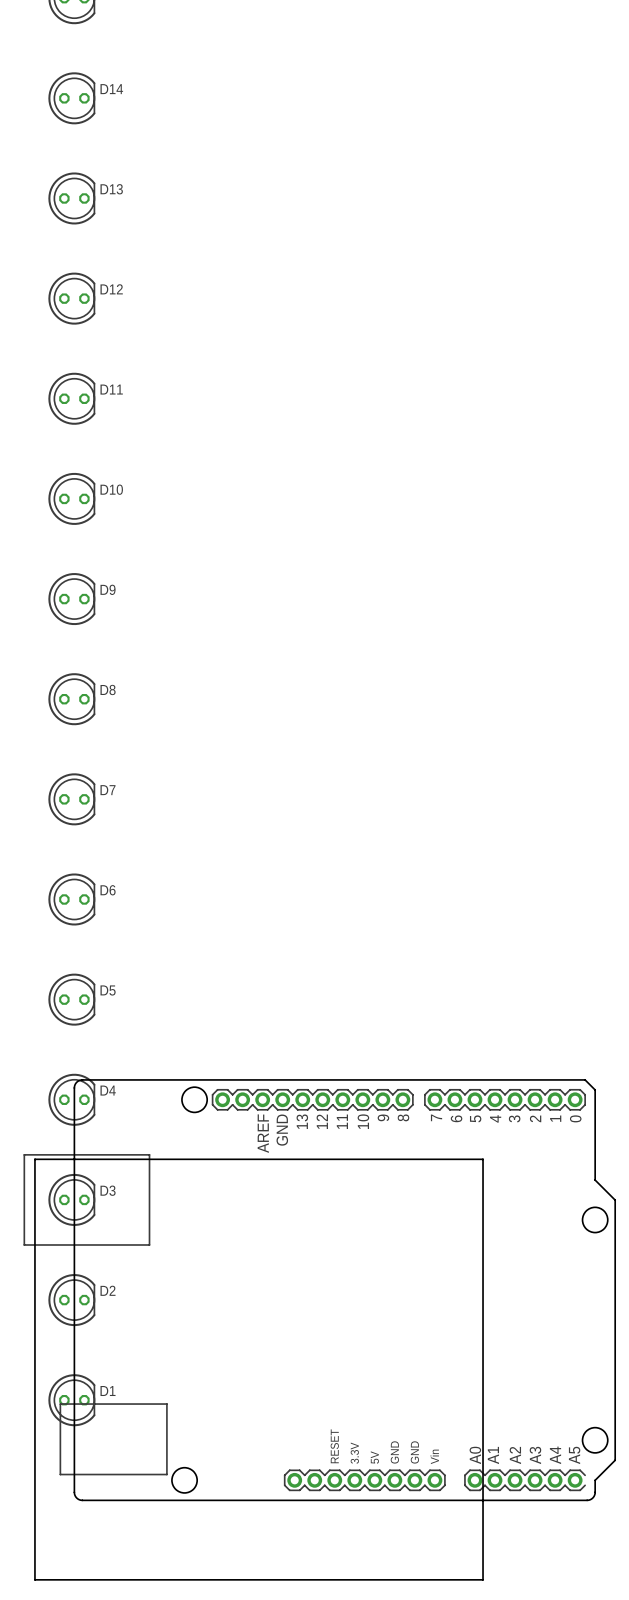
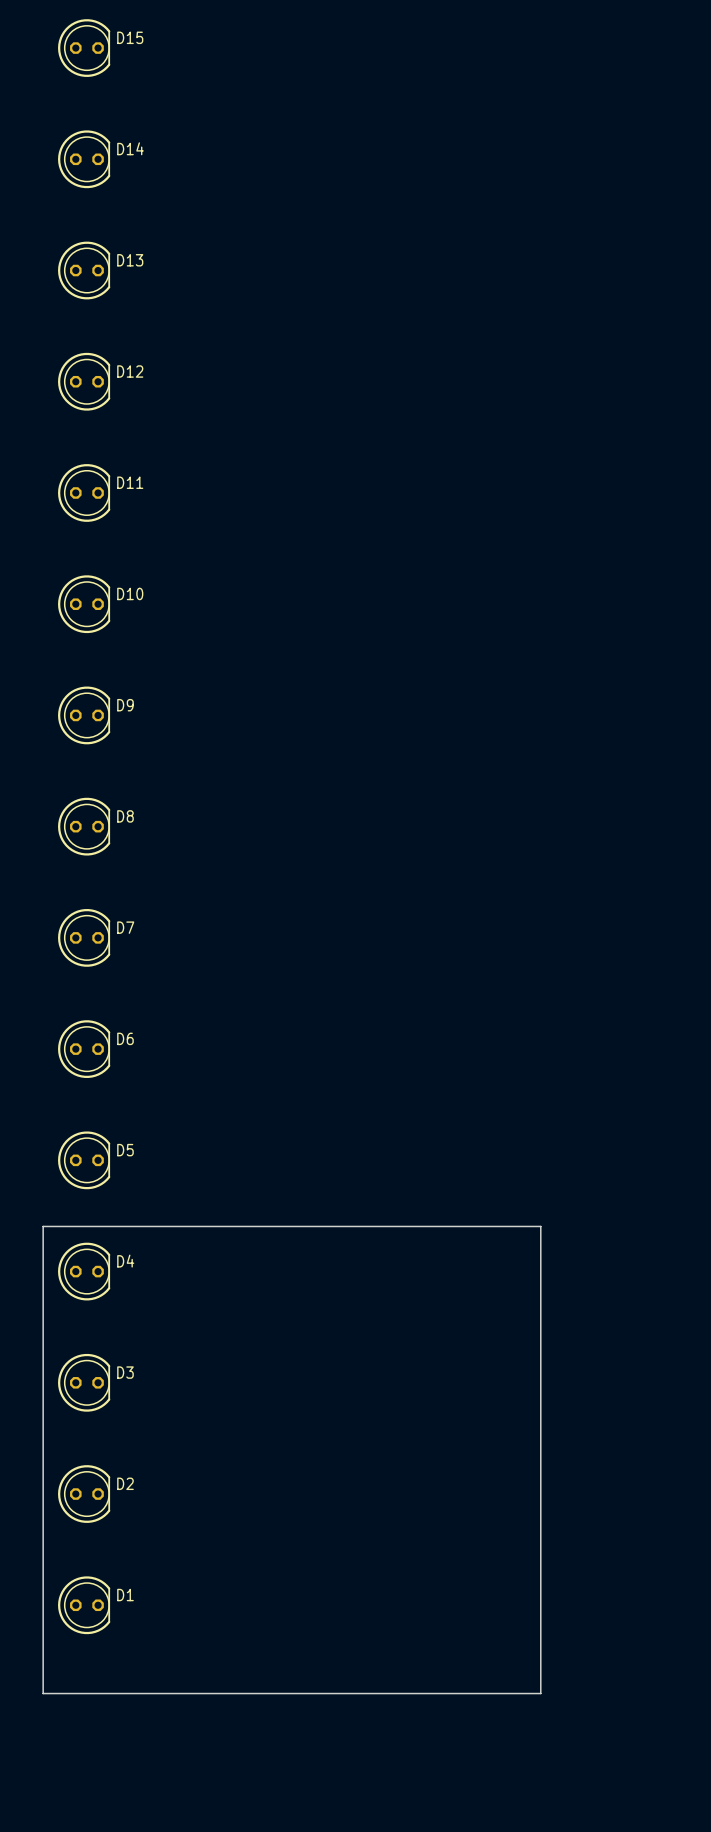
board edge: (34, 1159) (483, 1159) -> (43, 1337) (43, 1226) (540, 1226) (540, 1337)
part: (319, 1290) -> none
board edge: (34, 1479) (34, 1579) (483, 1579) (483, 1479) -> (43, 1693) (540, 1693)

